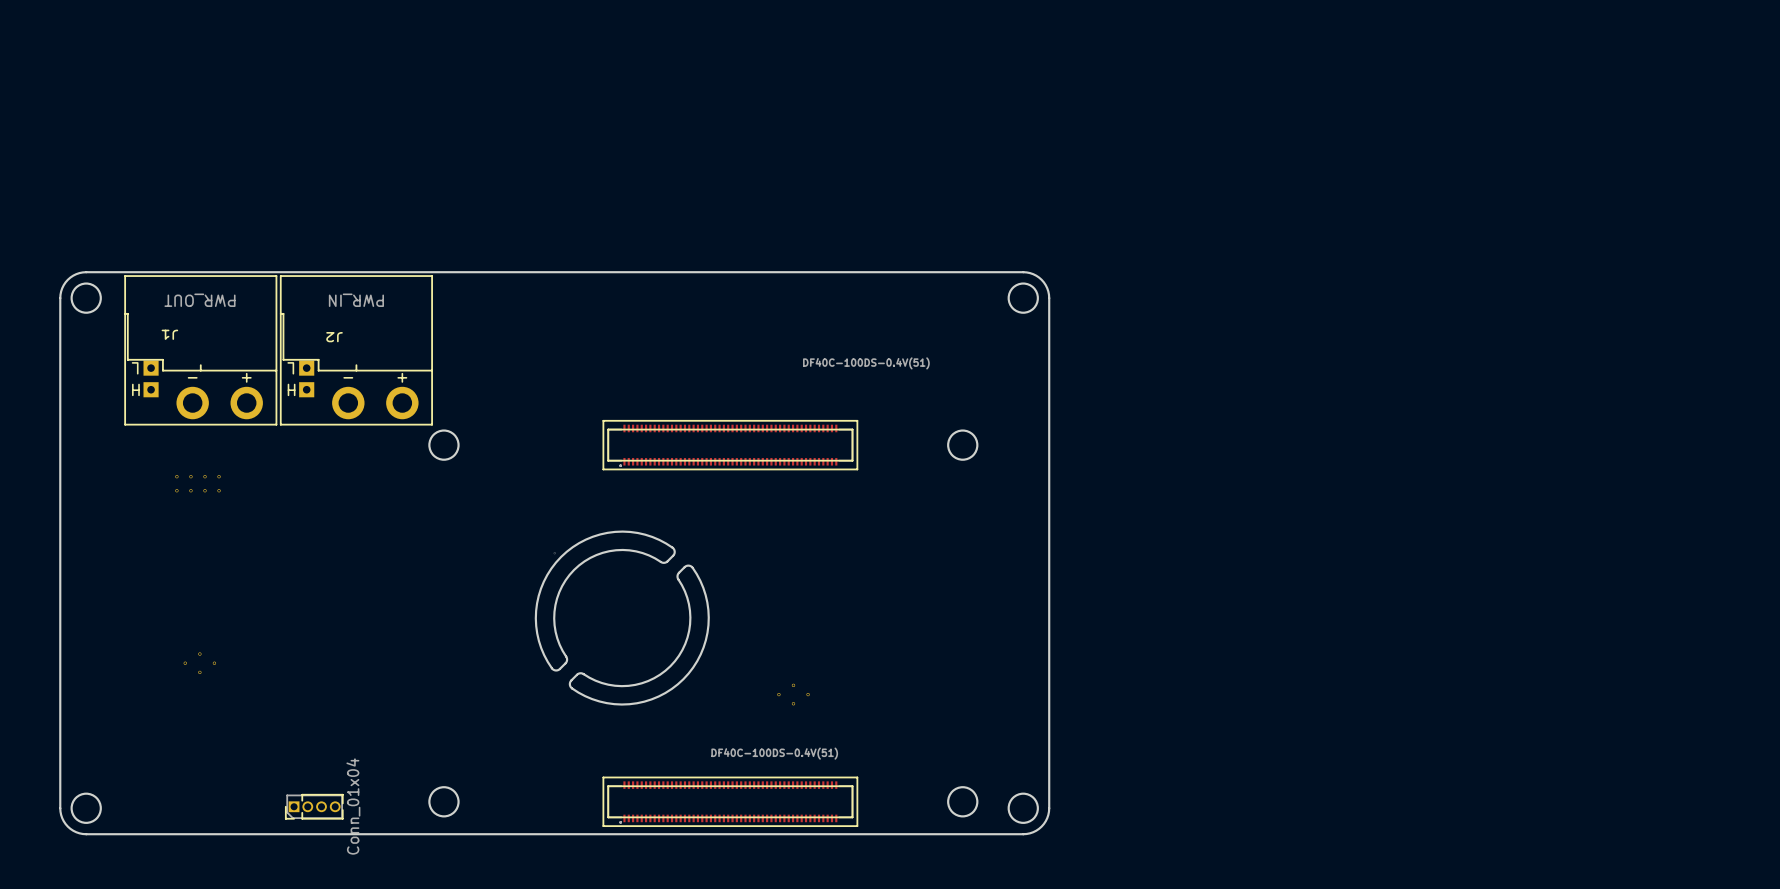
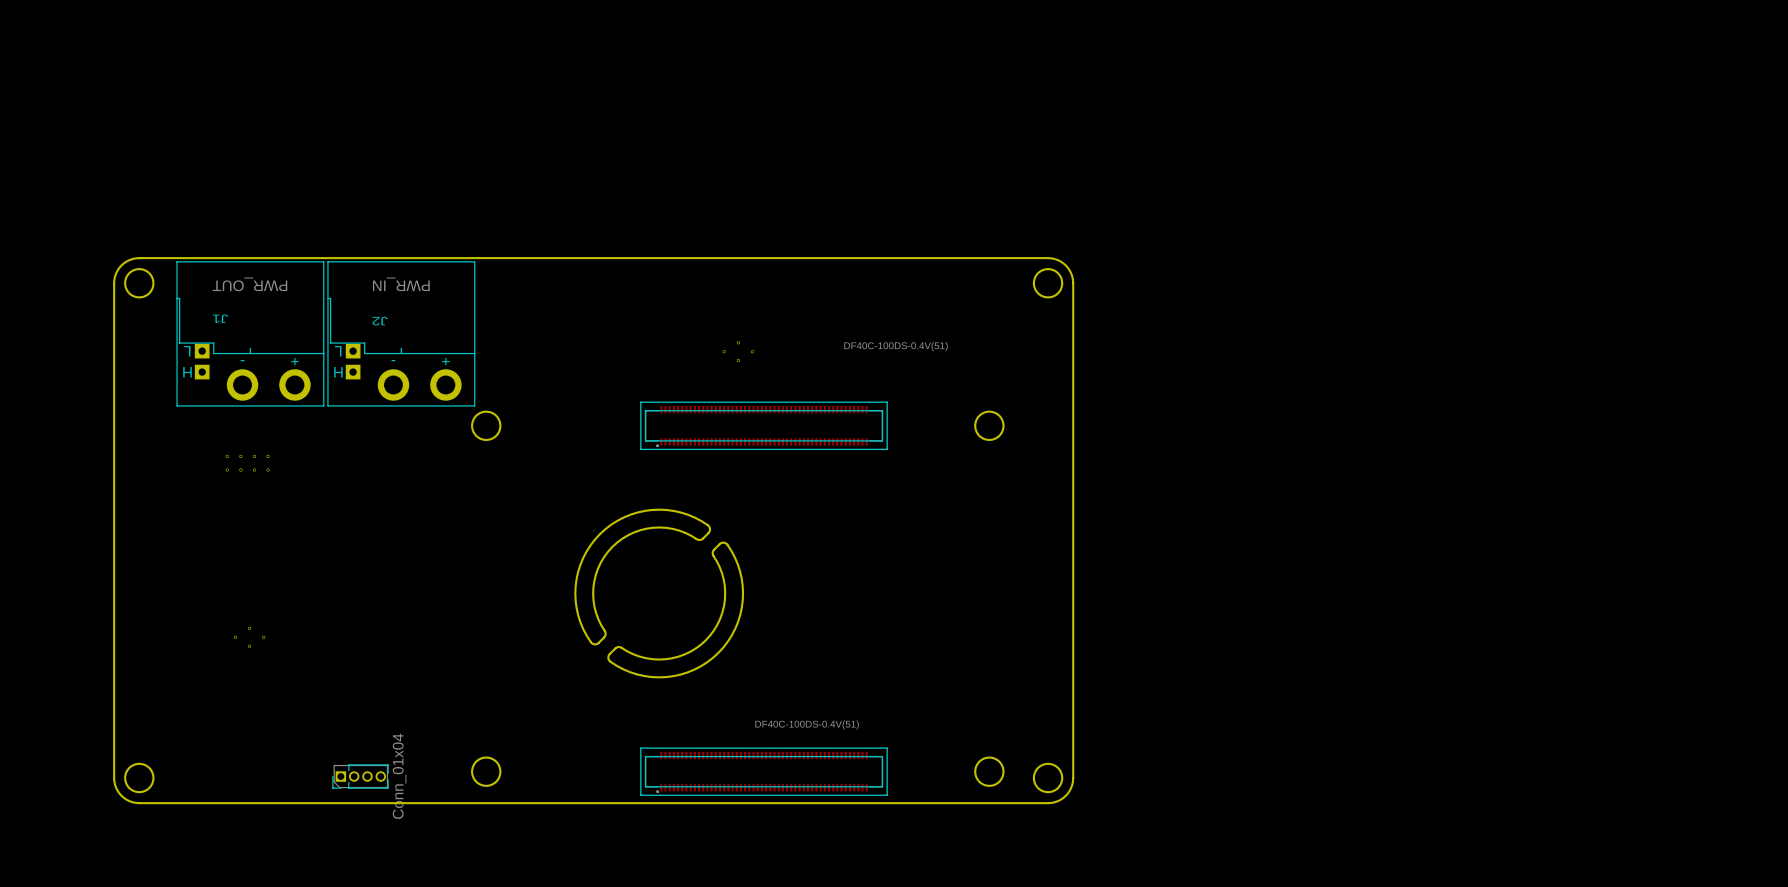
part: none -> (738, 351)
part: (793, 694) -> none

